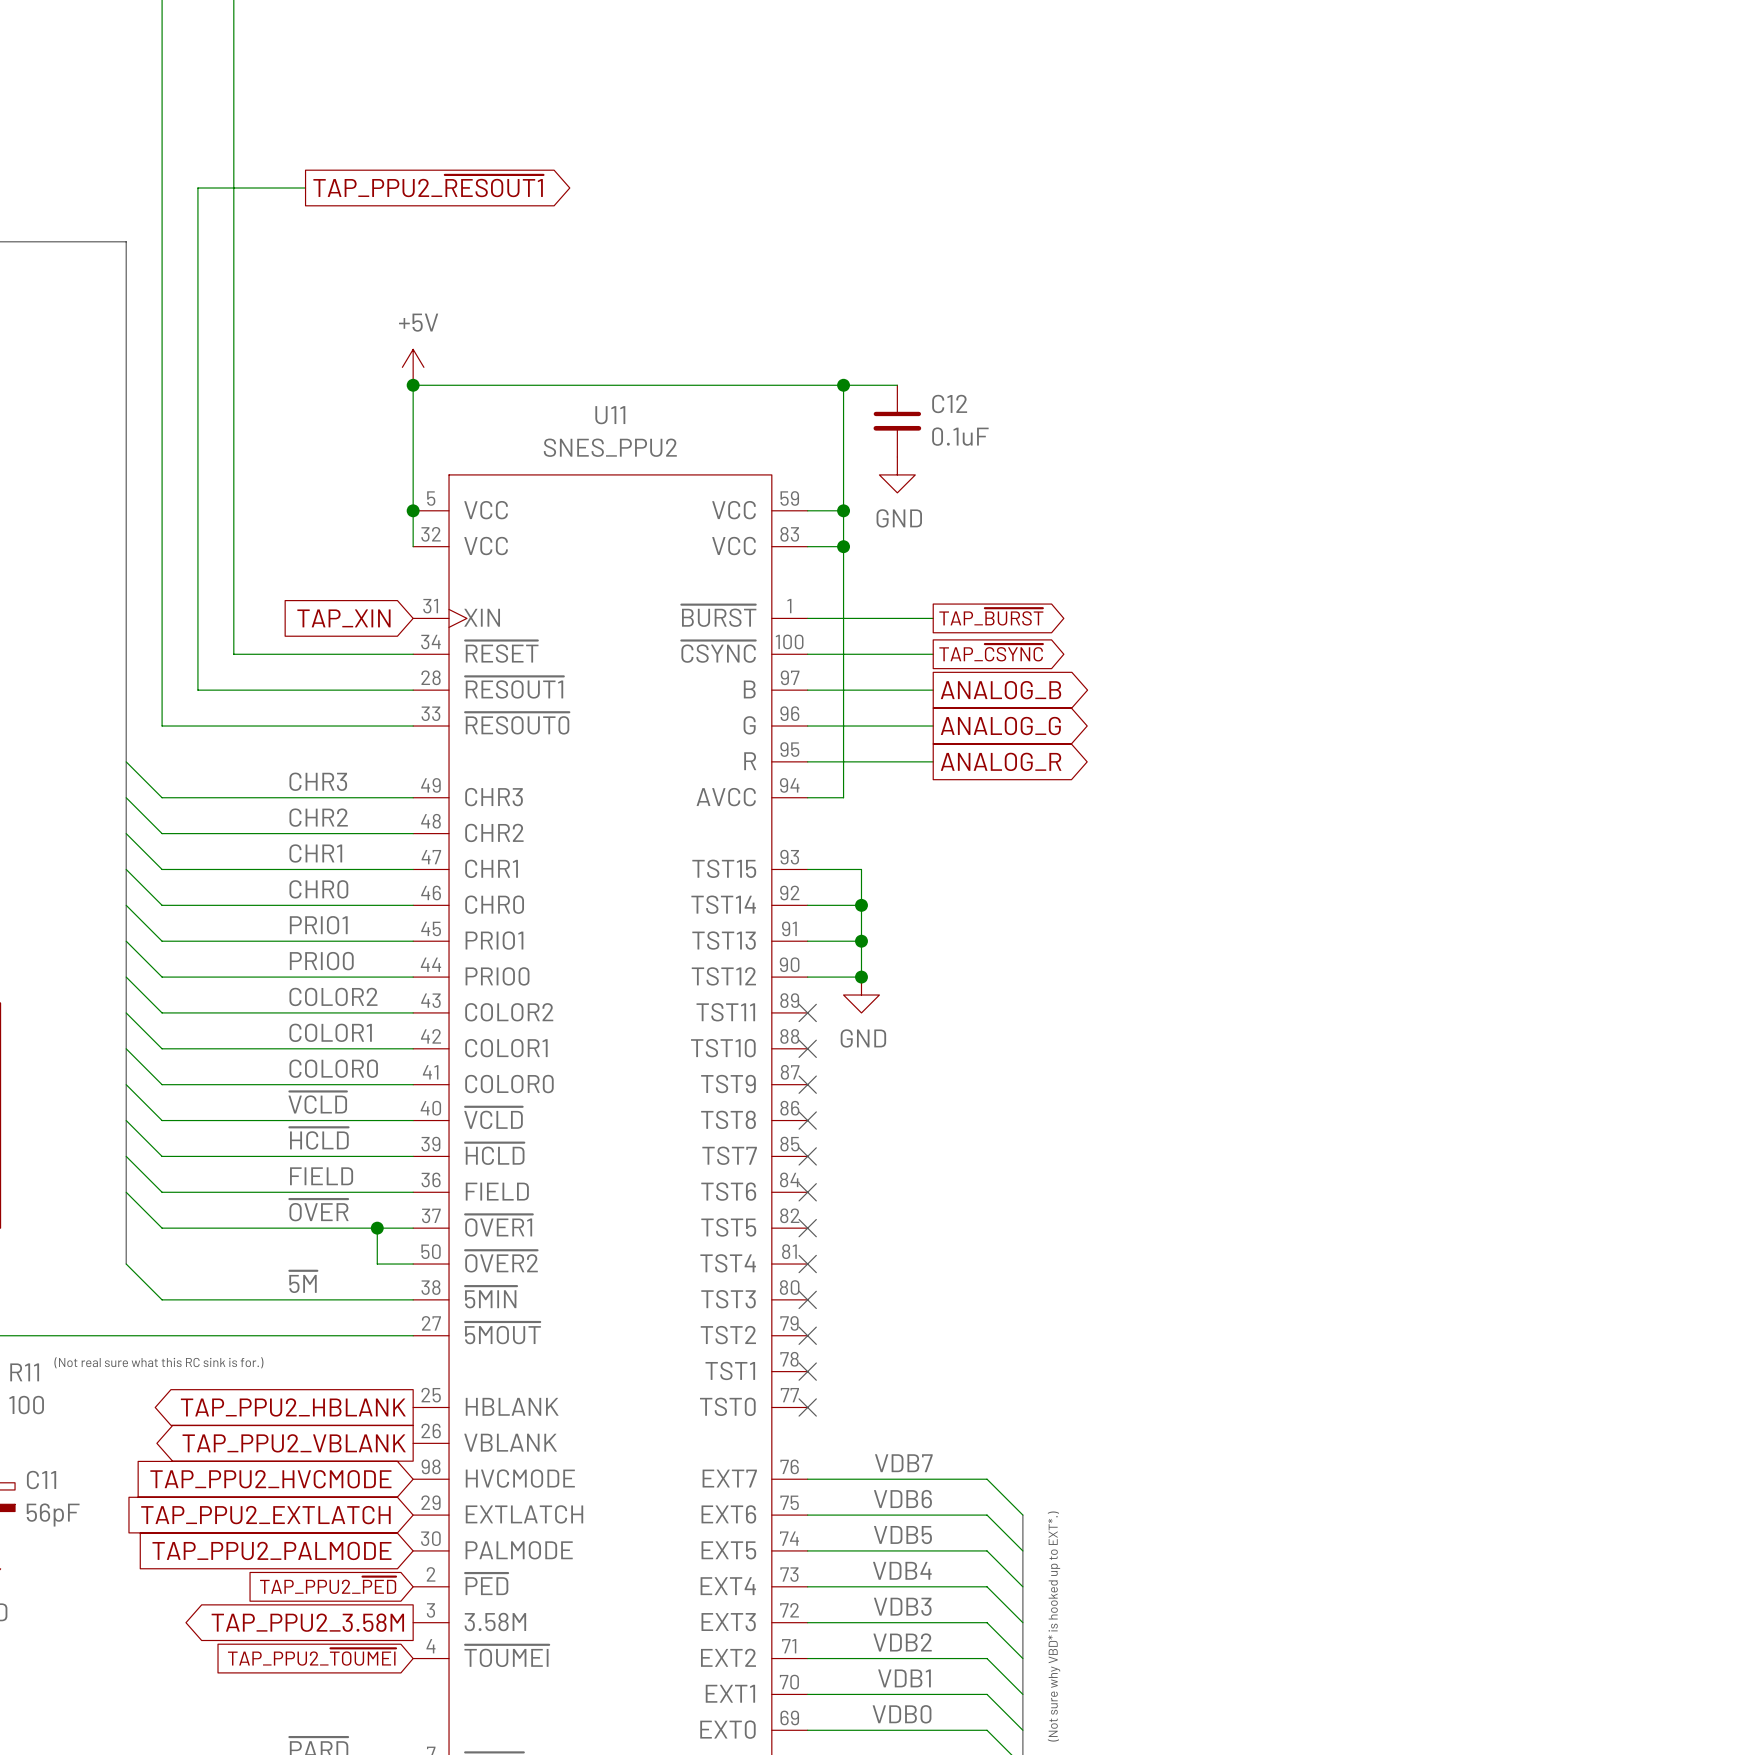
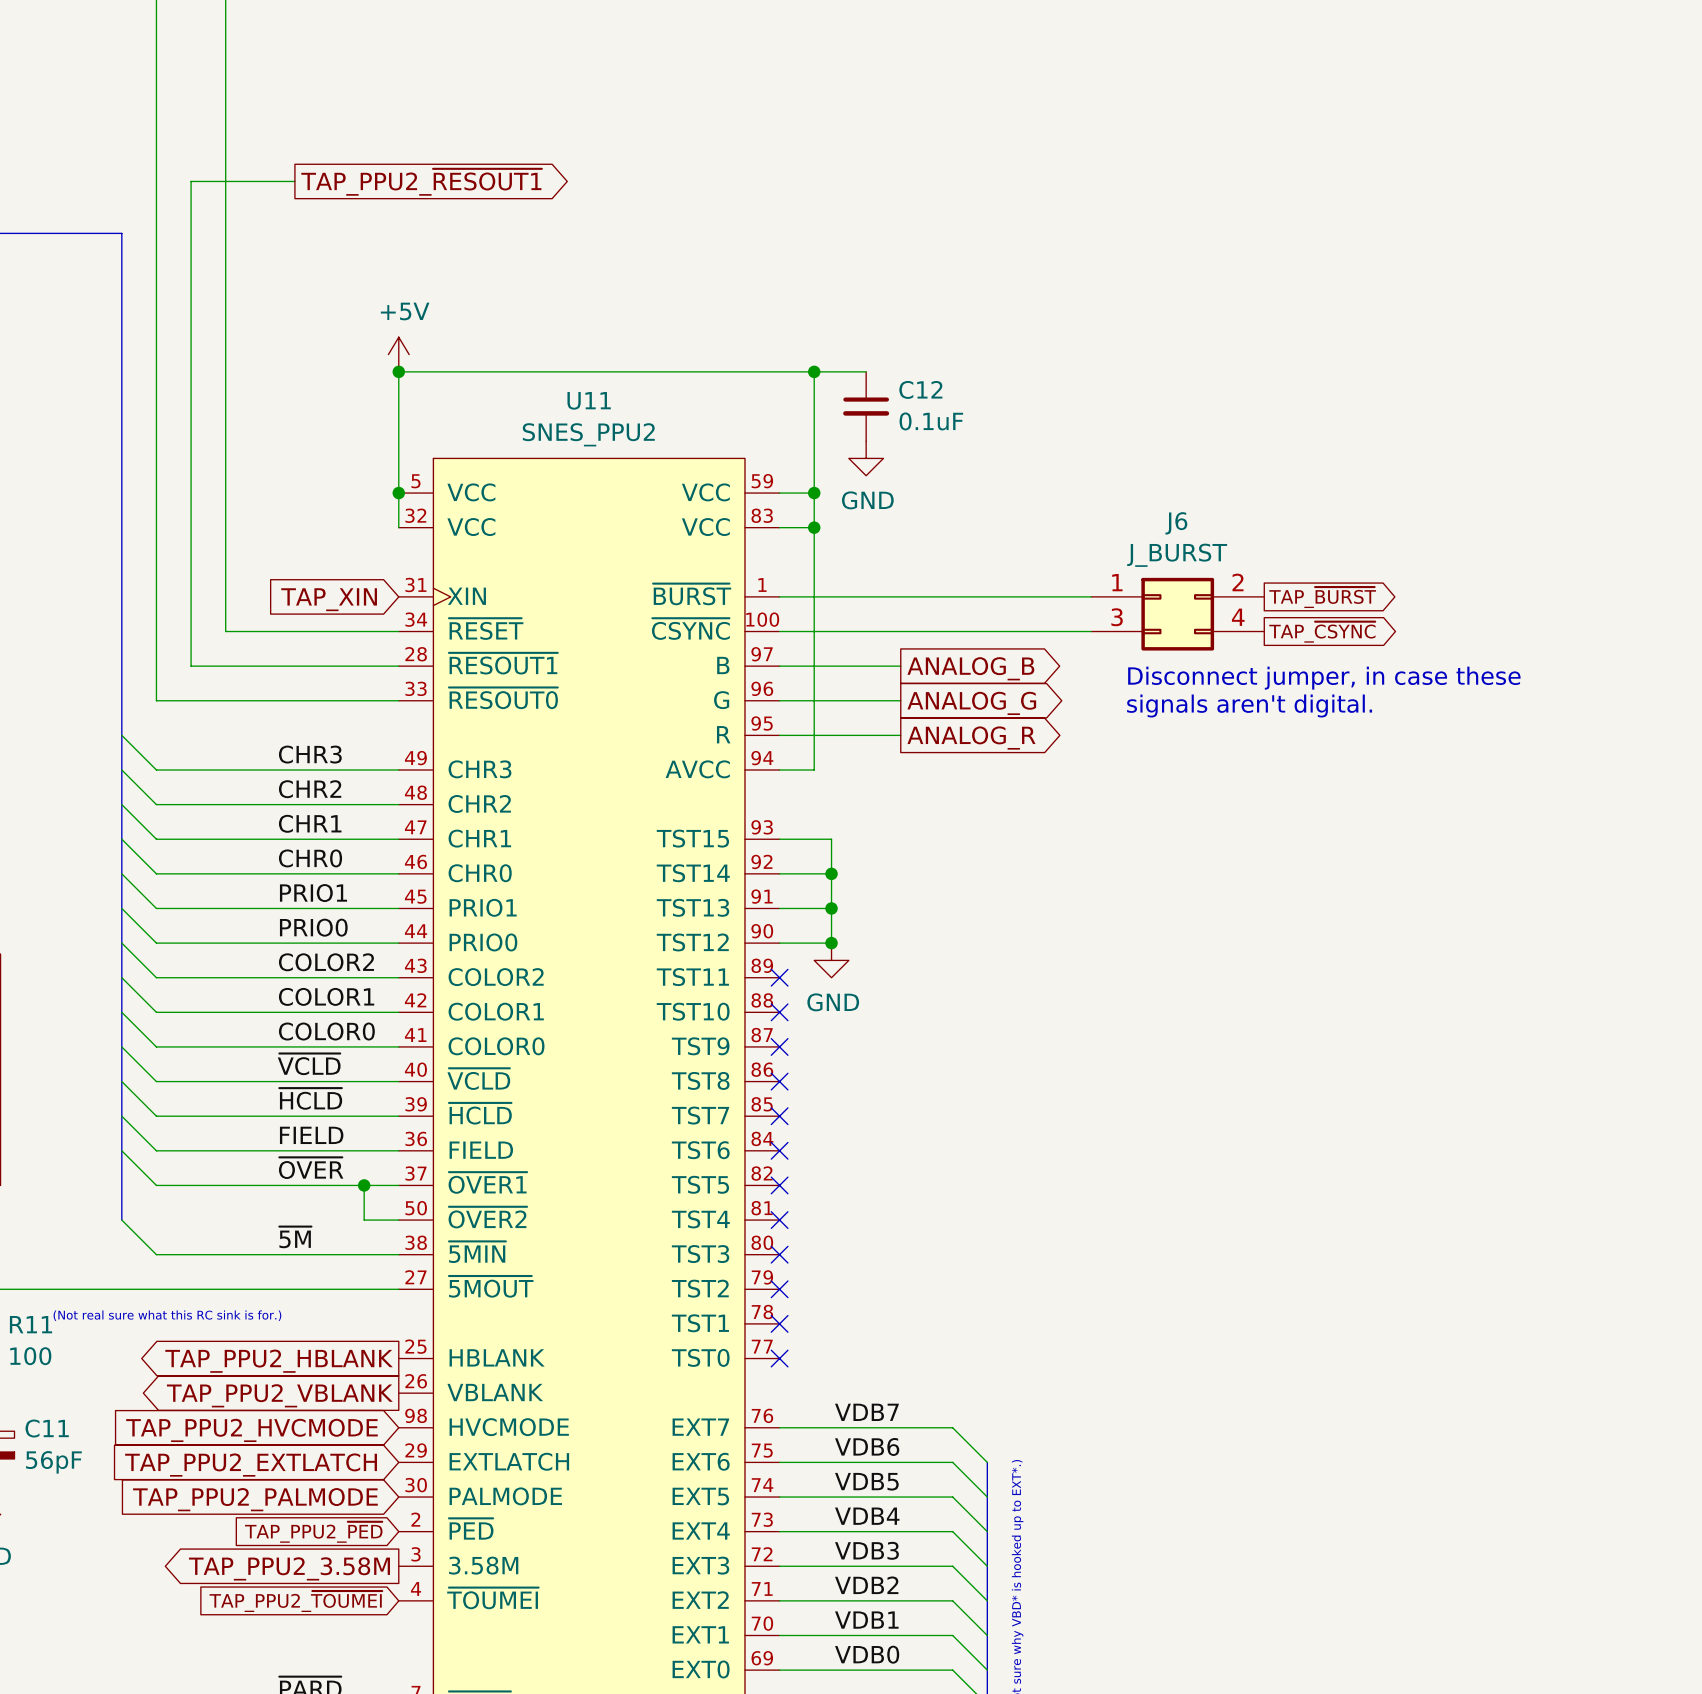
global label: TAP_~{BURST} (991, 616) -> none
global label: none -> TAP_~{BURST} (1322, 597)
wire: none -> (900, 596) (1091, 596)
J6: none -> J_BURST (1177, 614)
global label: TAP_~{CSYNC} (991, 652) -> none
global label: none -> TAP_~{CSYNC} (1322, 632)
wire: none -> (900, 631) (1091, 631)
text: none -> Disconnect jumper, in case these (1324, 678)
text: none -> signals aren't digital. (1249, 705)

